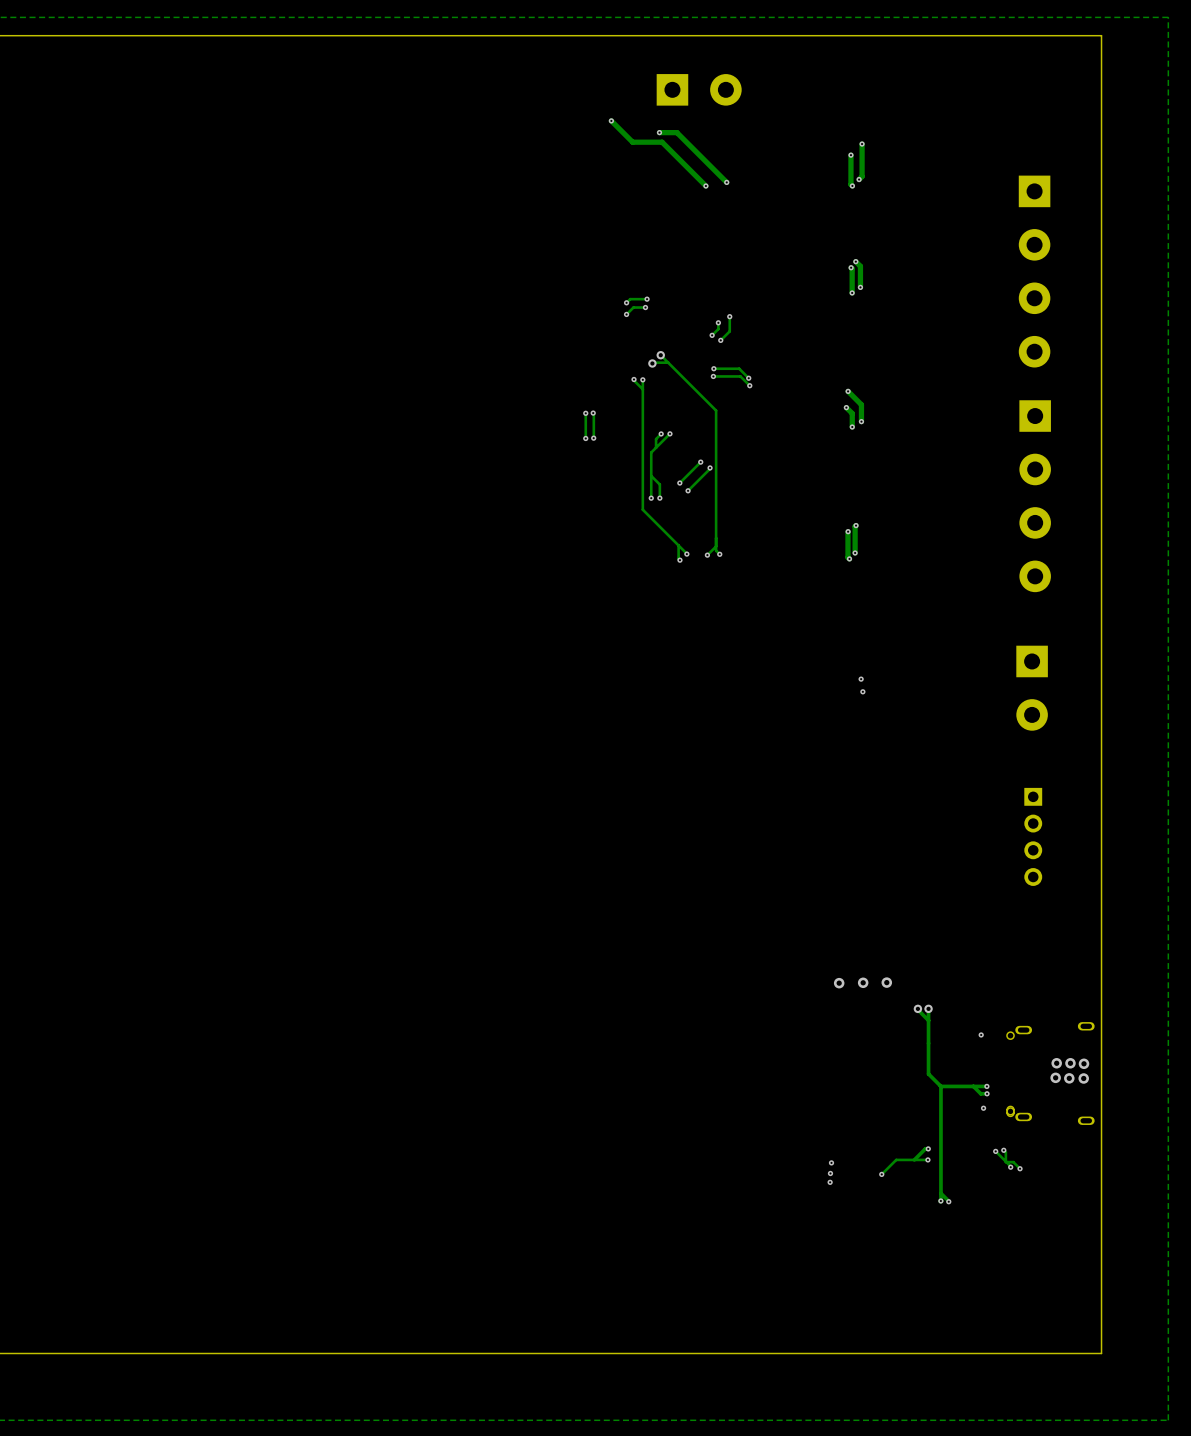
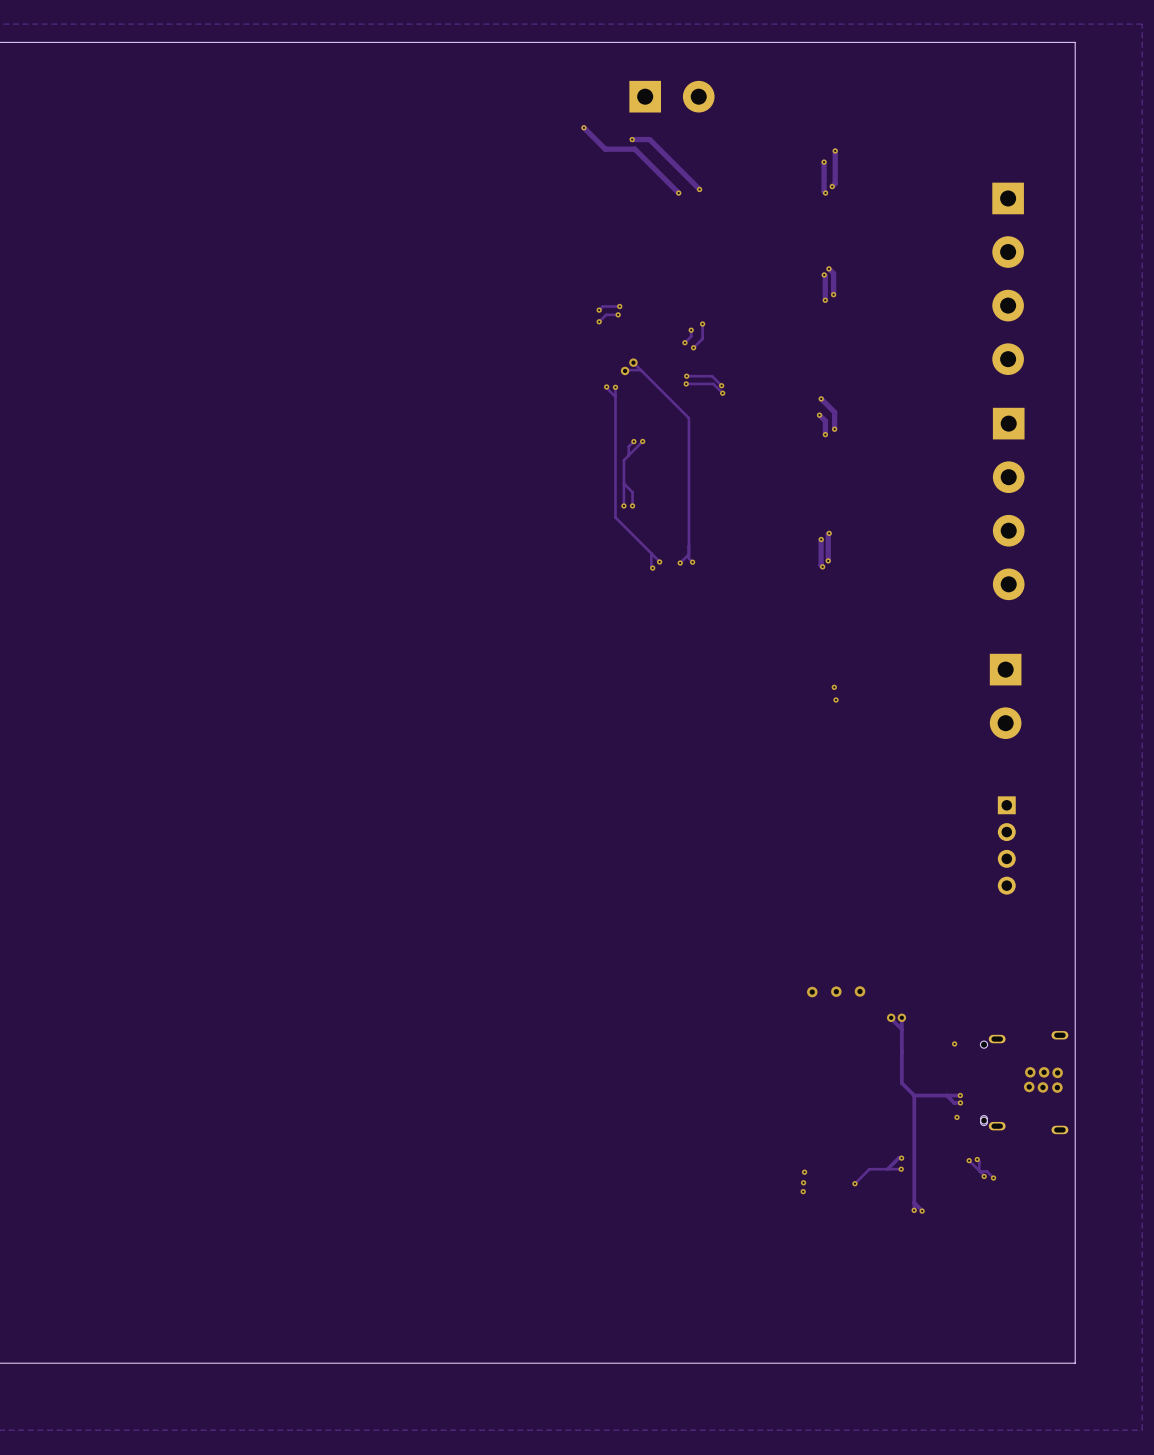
track: (585, 413) (585, 438) -> none
via: (585, 413) -> none
track: (593, 413) (593, 438) -> none
via: (593, 413) -> none
via: (585, 438) -> none
via: (593, 438) -> none
track: (700, 462) (679, 483) -> none
via: (700, 462) -> none
track: (710, 467) (688, 490) -> none
via: (710, 467) -> none
via: (679, 483) -> none
via: (688, 490) -> none

